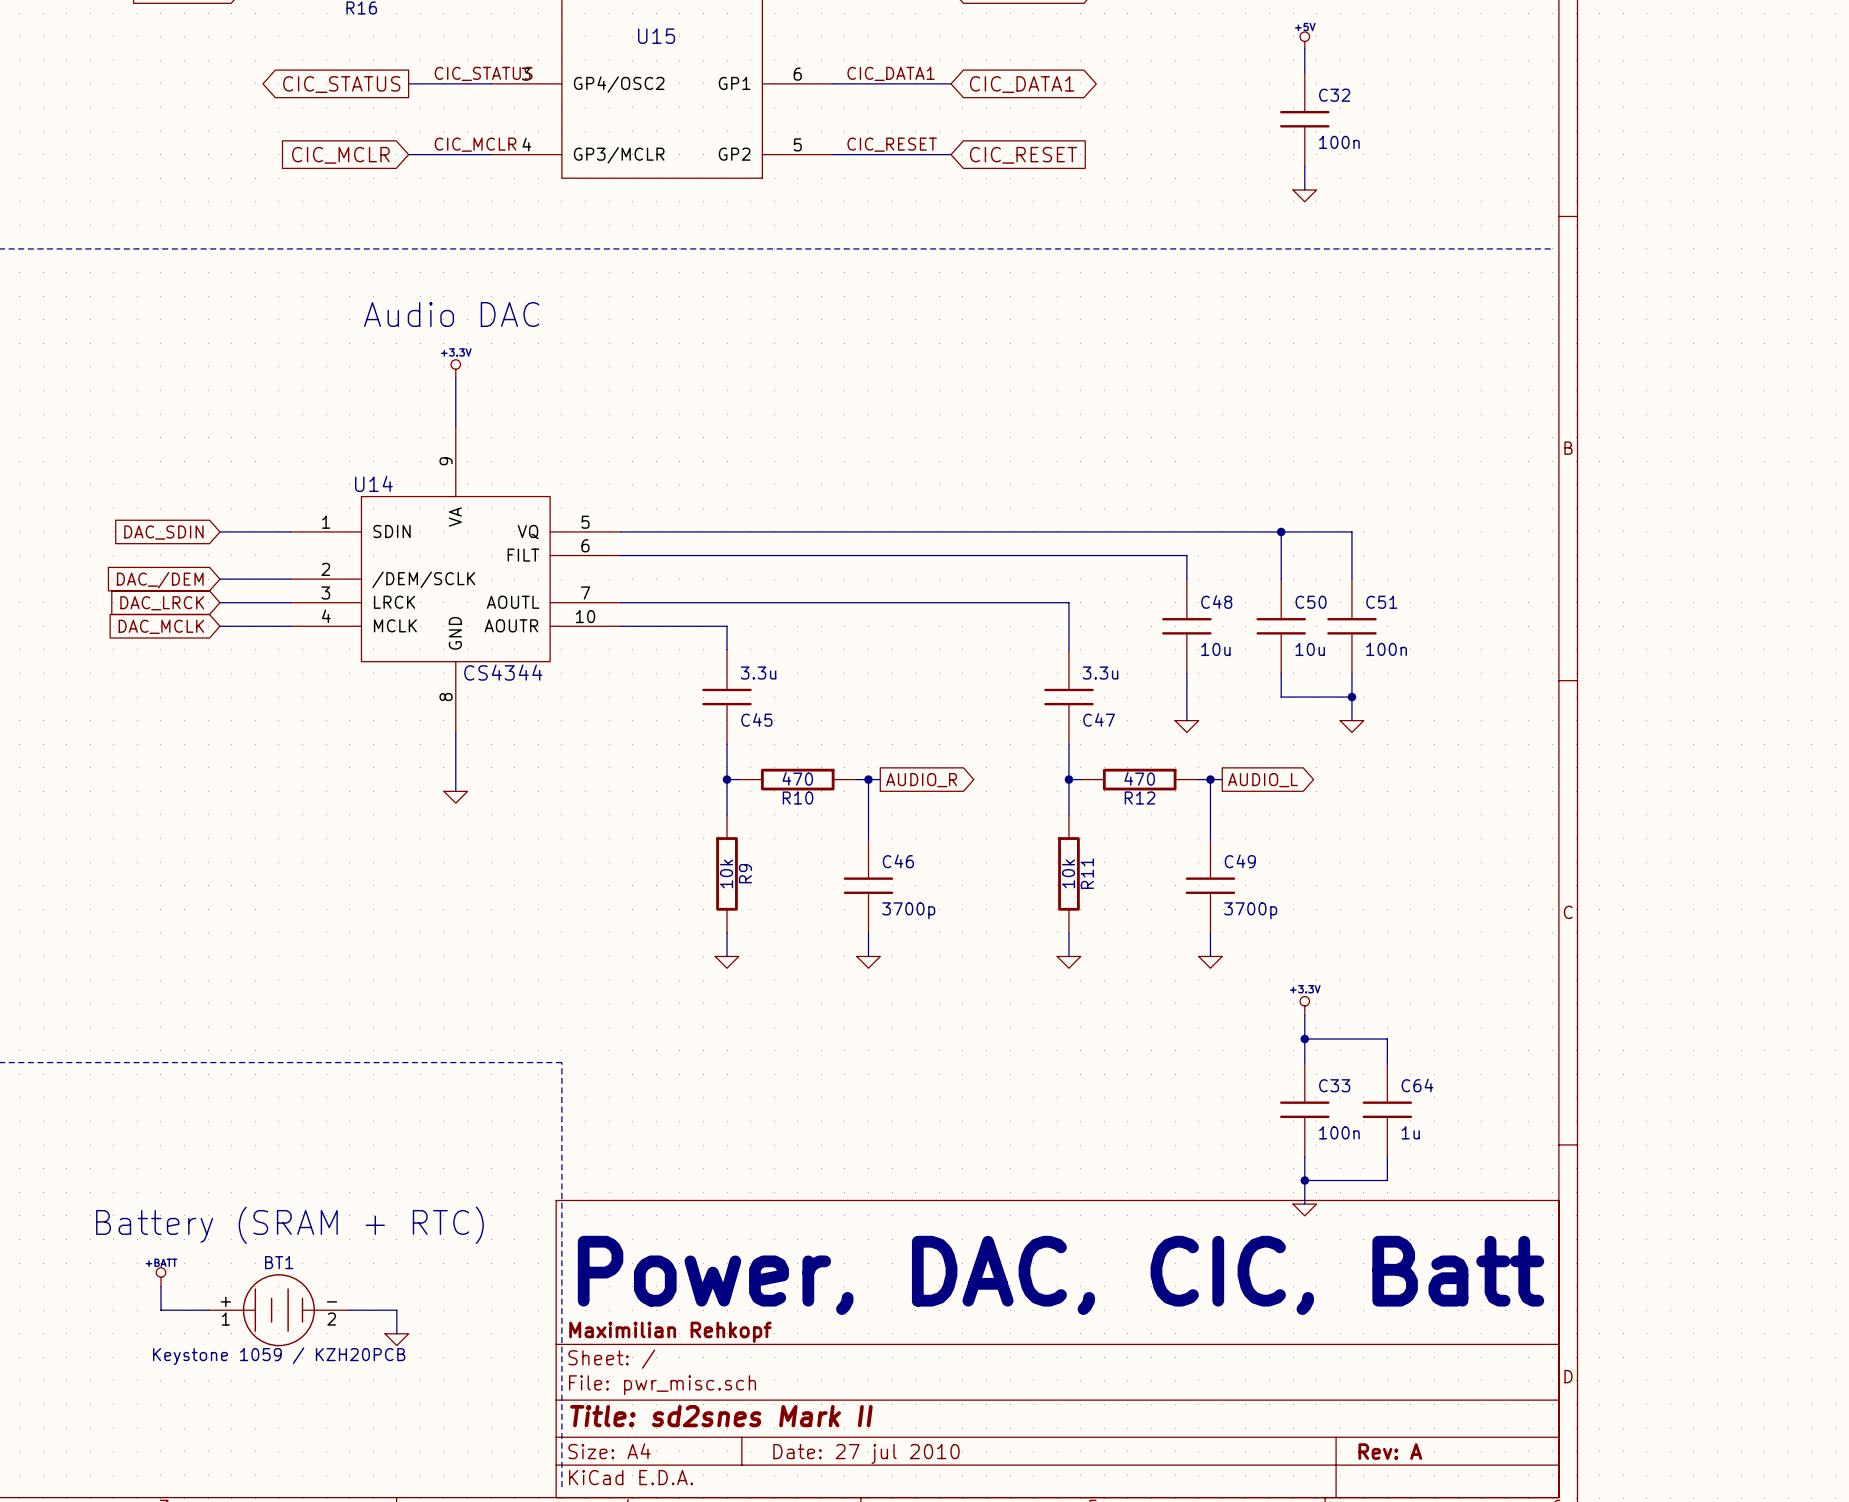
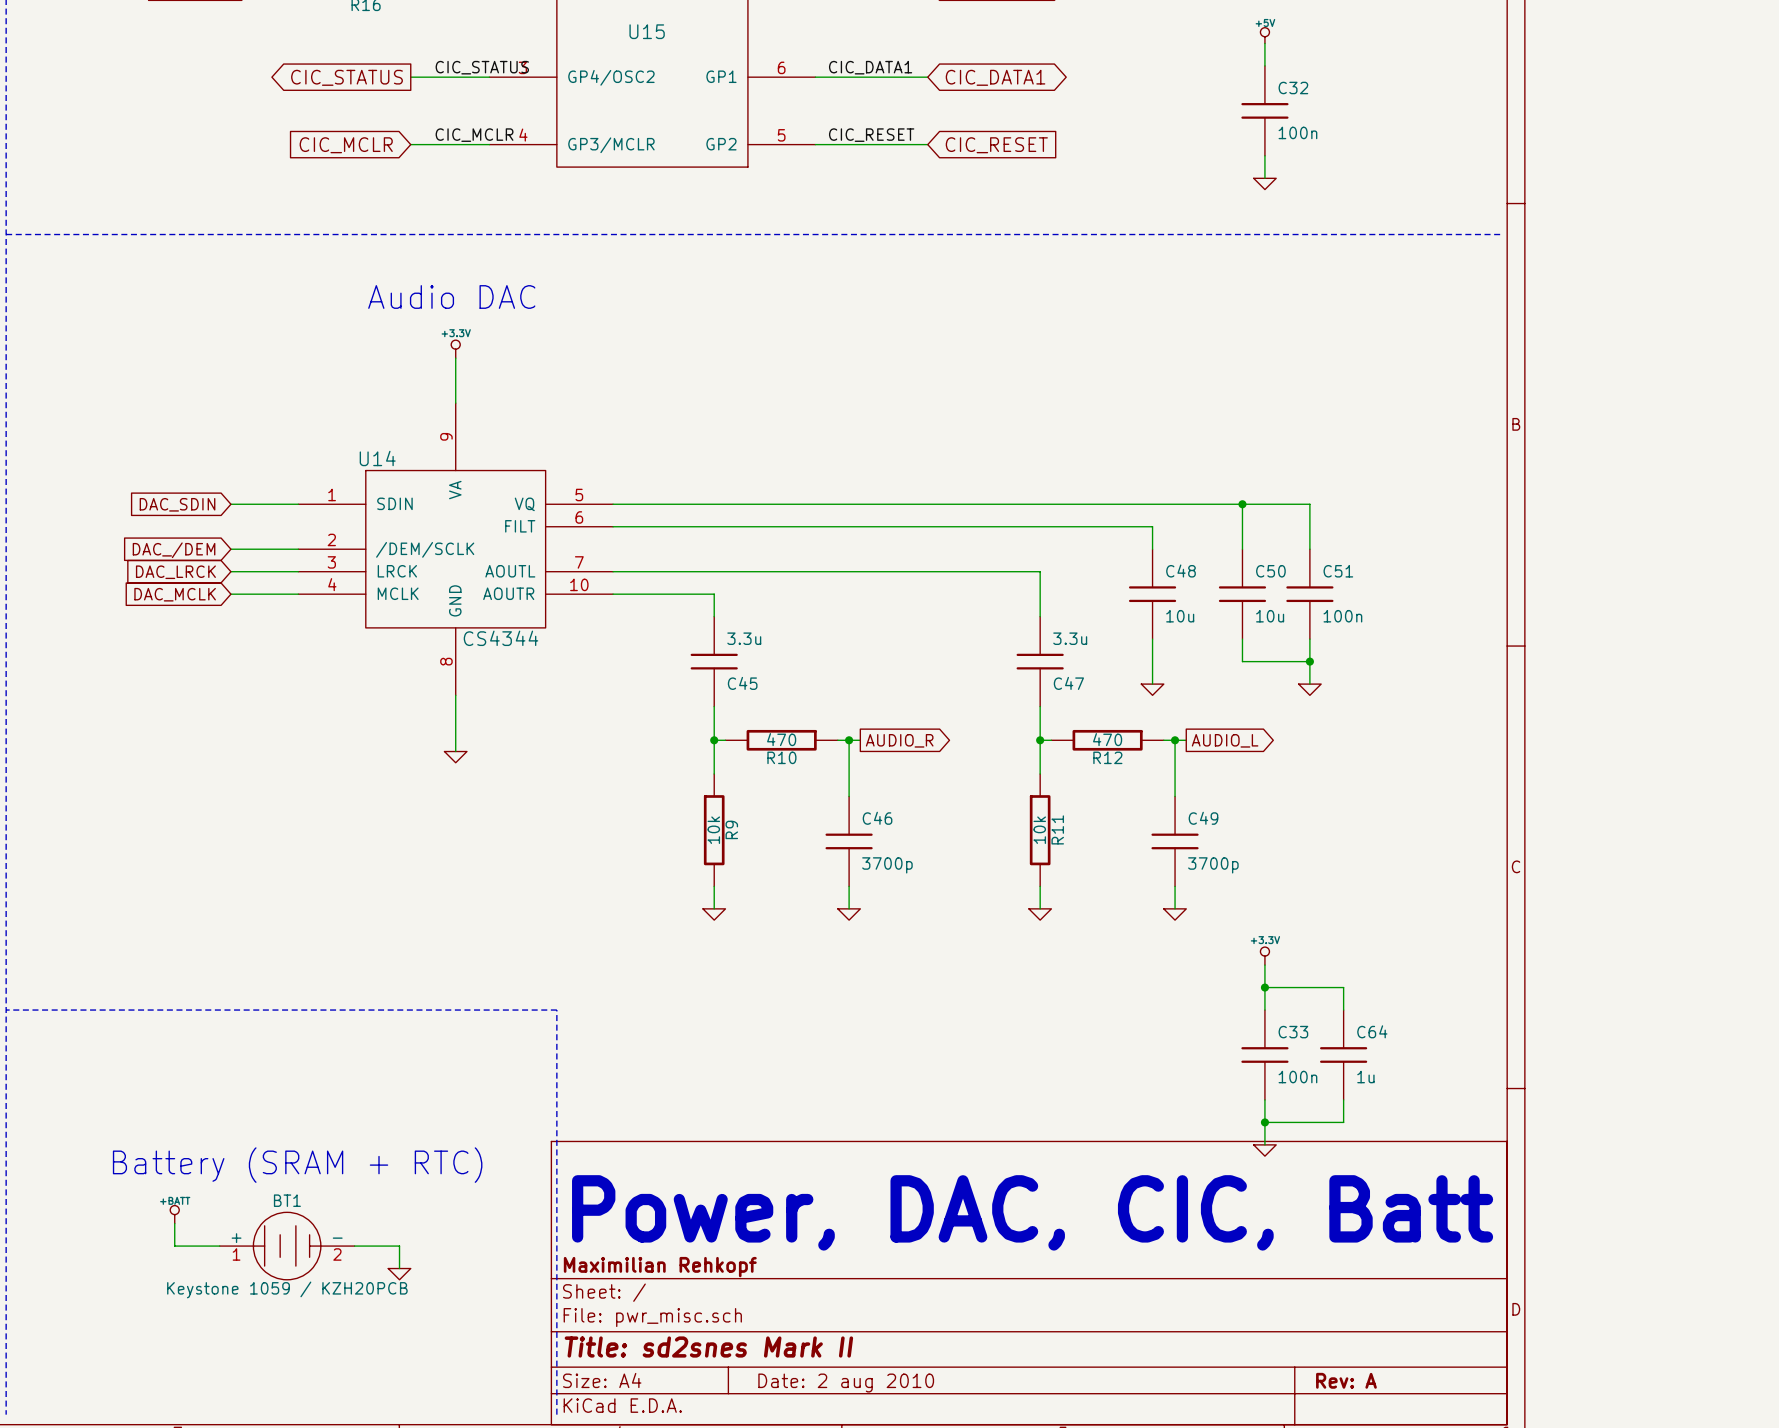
title block: Date: 27 jul 2010 (866, 1453) -> Date: 2 aug 2010 (846, 1383)

